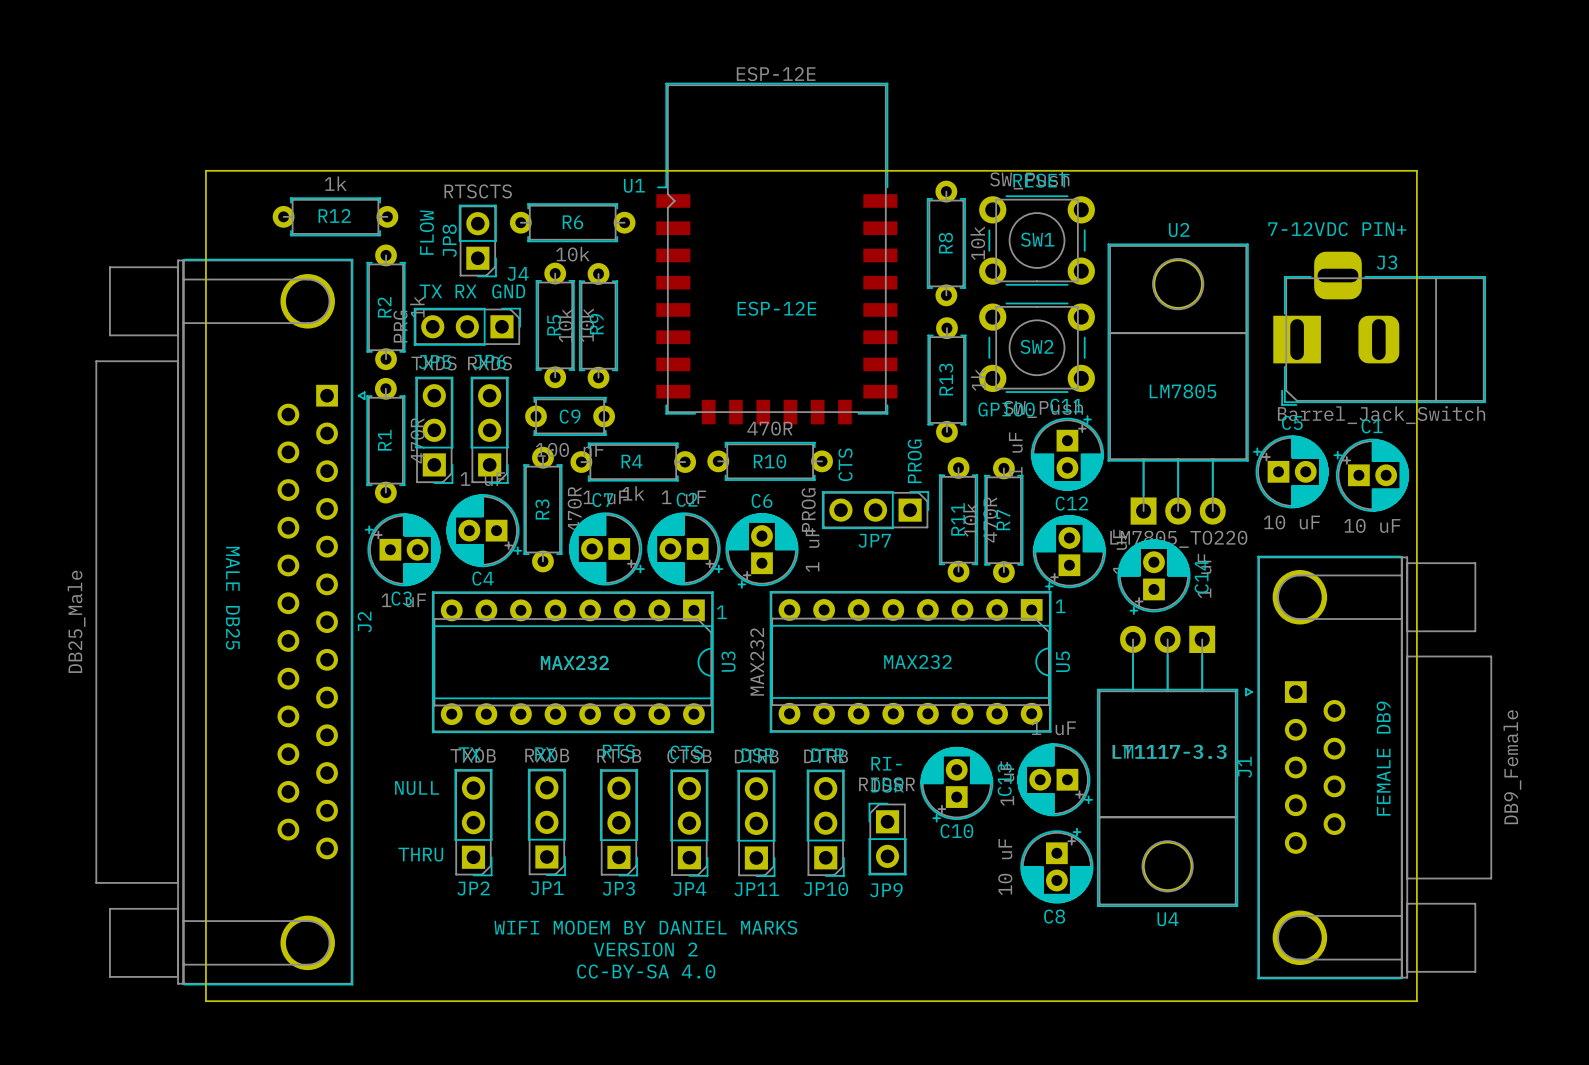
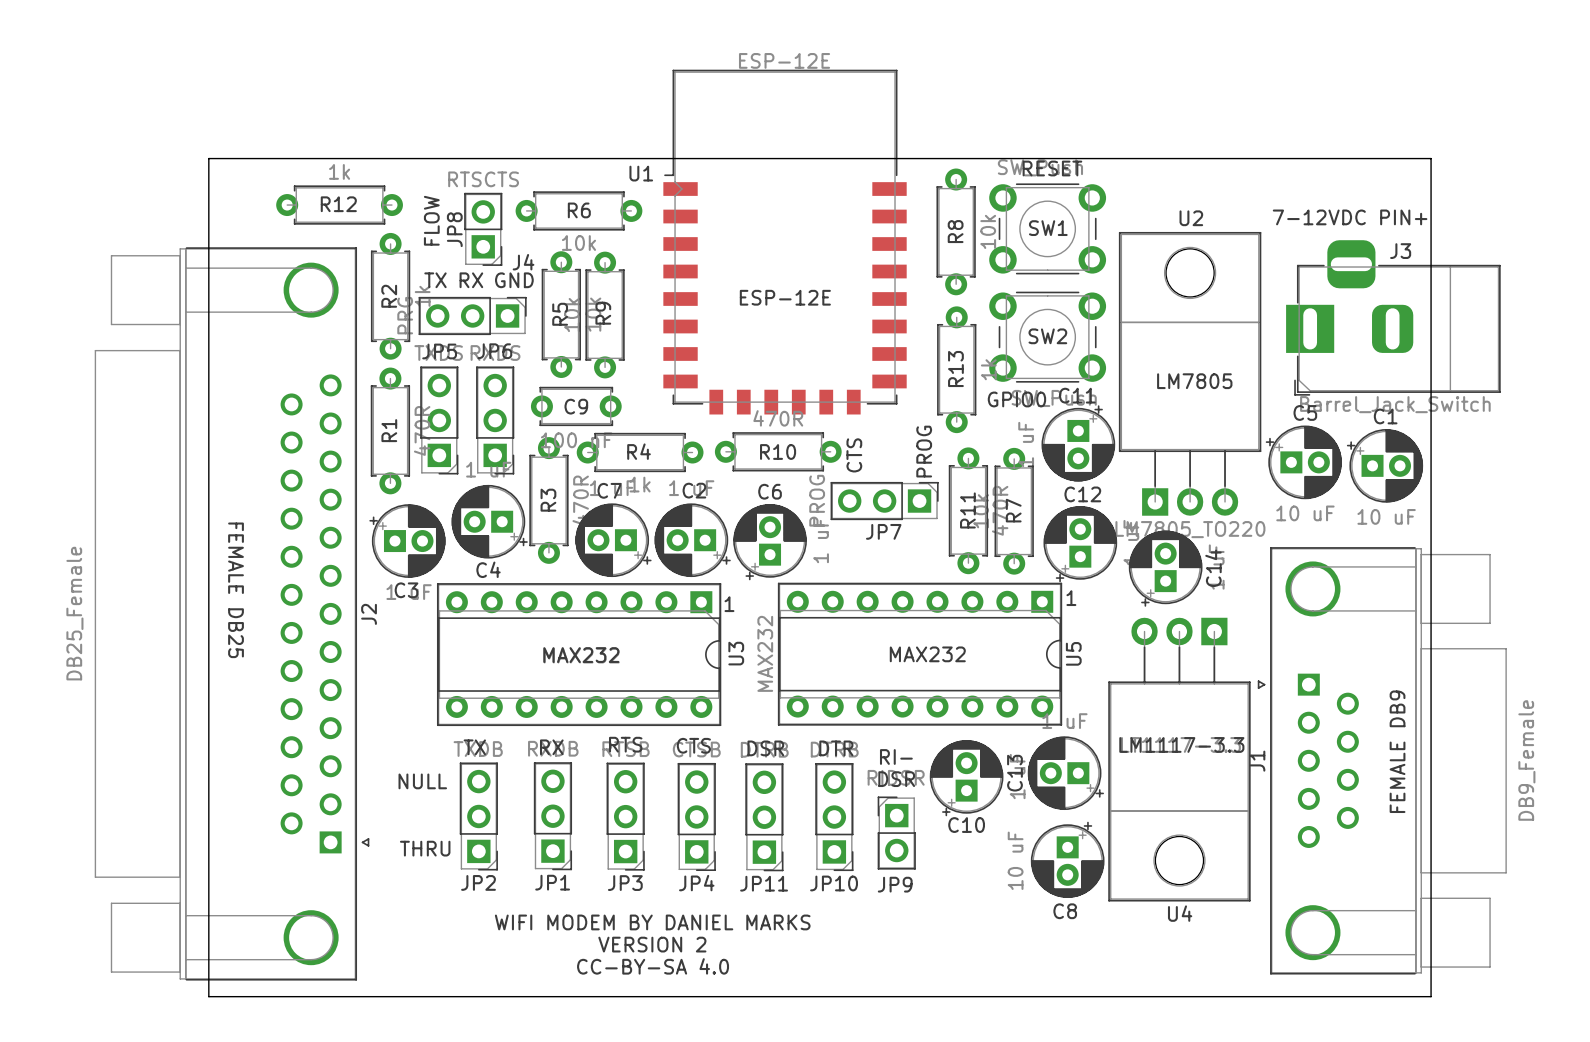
J2 footprint: [95, 258, 366, 986] -> [94, 247, 370, 981]
text: MALE DB25 (232, 598) -> FEMALE DB25 (236, 590)
J2 value: DB25_Male (76, 621) -> DB25_Female (74, 613)

